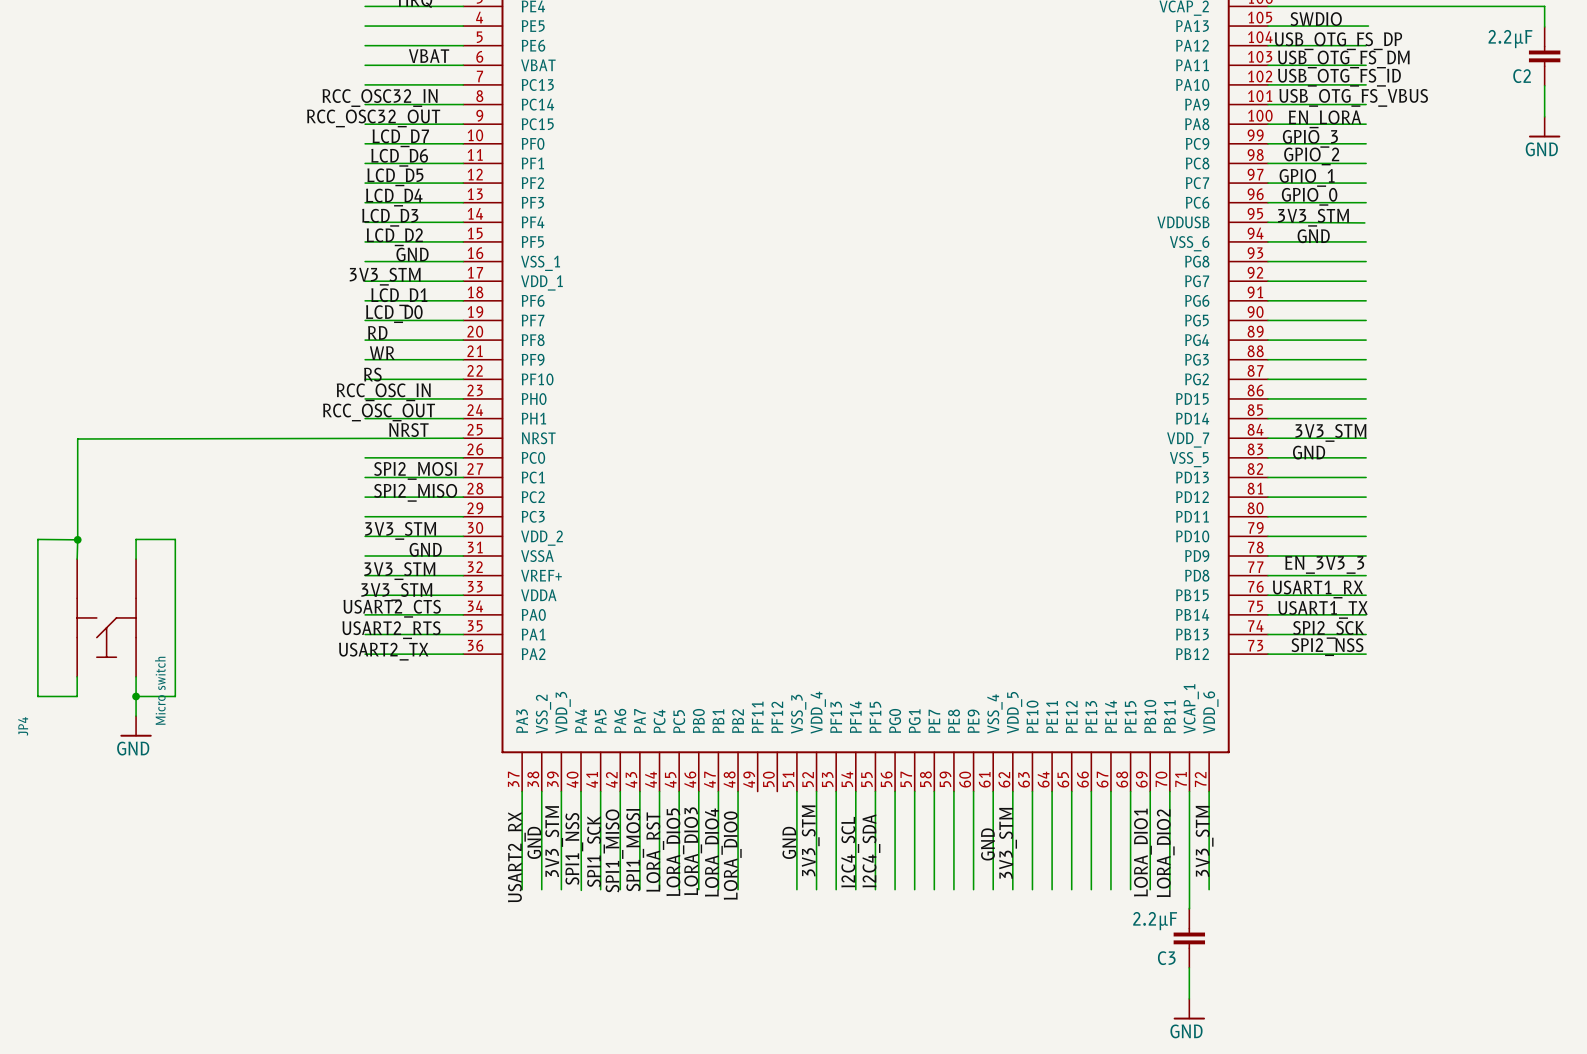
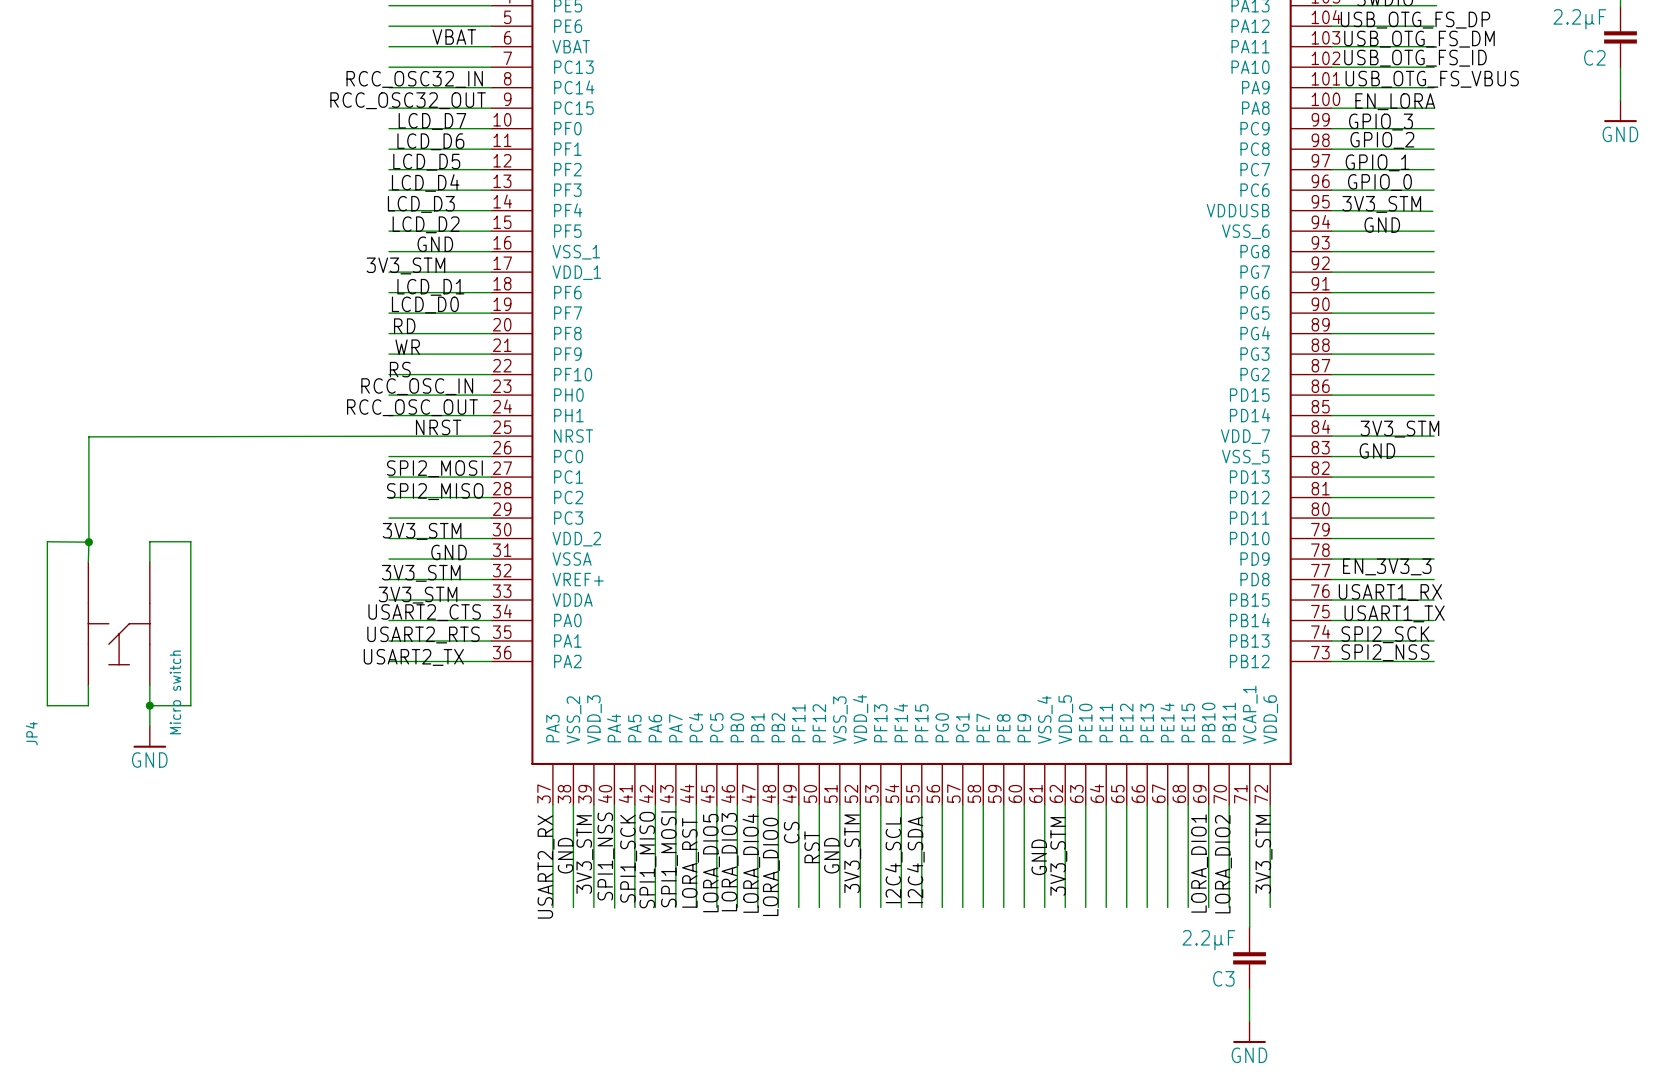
wire: none -> (798, 804) (798, 907)
wire: none -> (819, 804) (819, 907)
label: none -> CS (791, 832)
label: none -> RST (812, 847)

